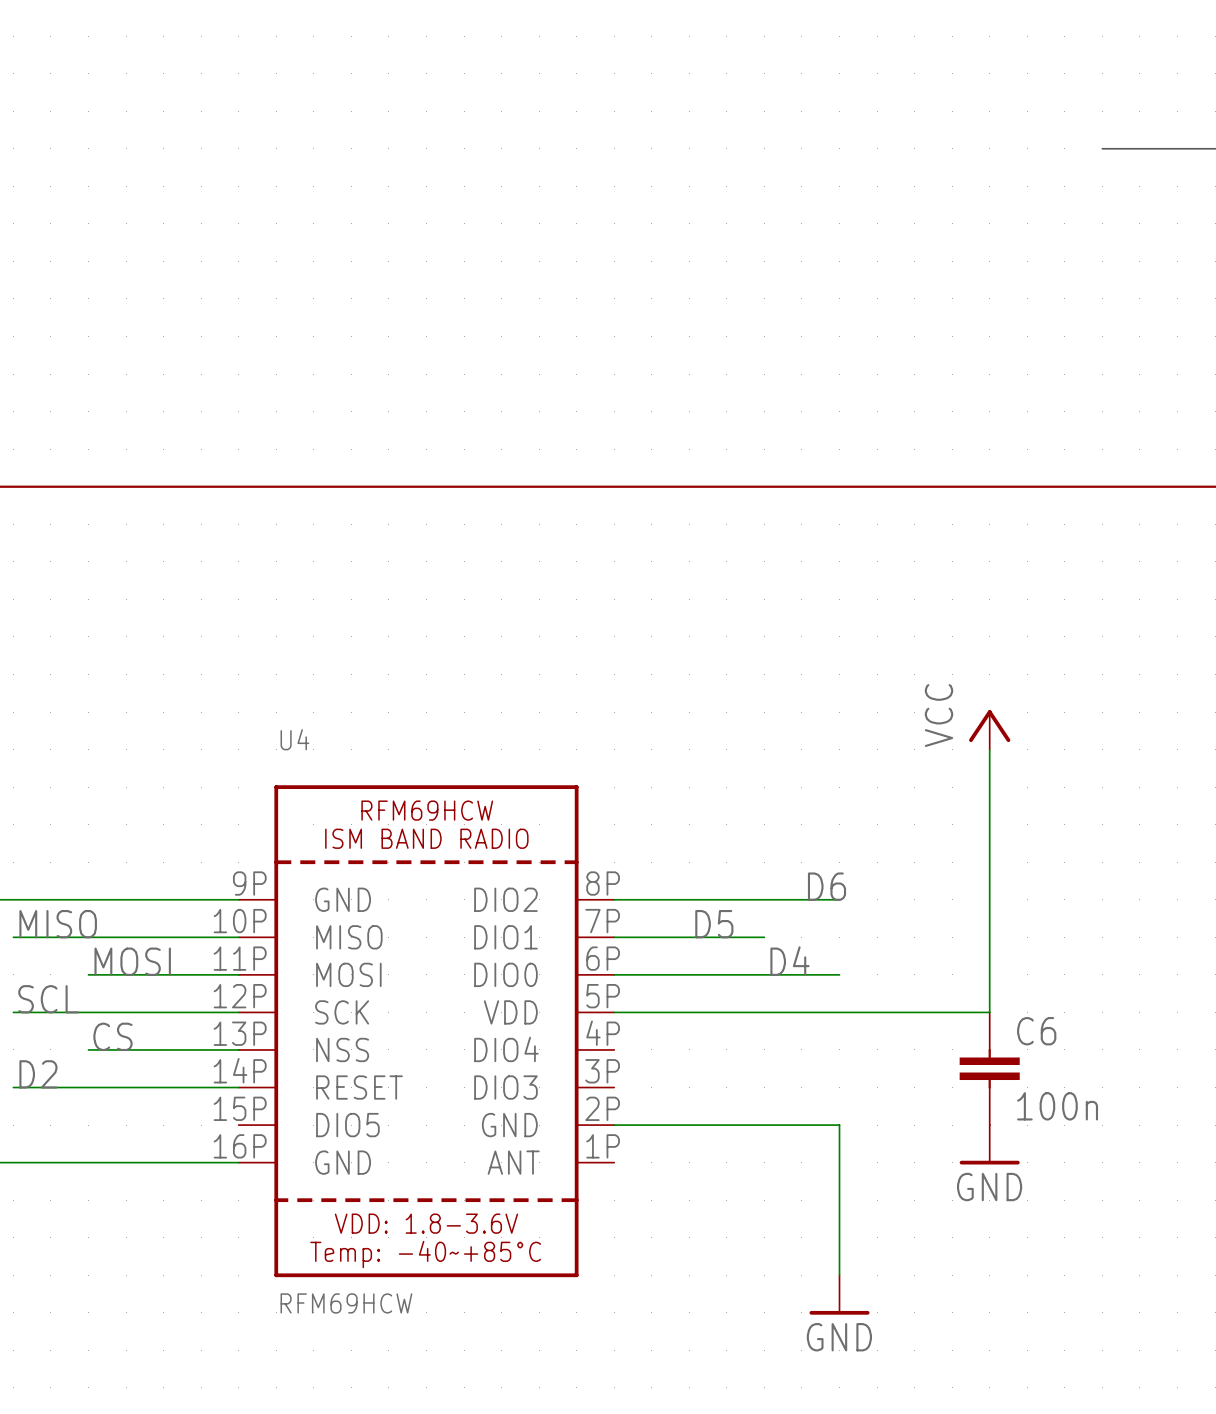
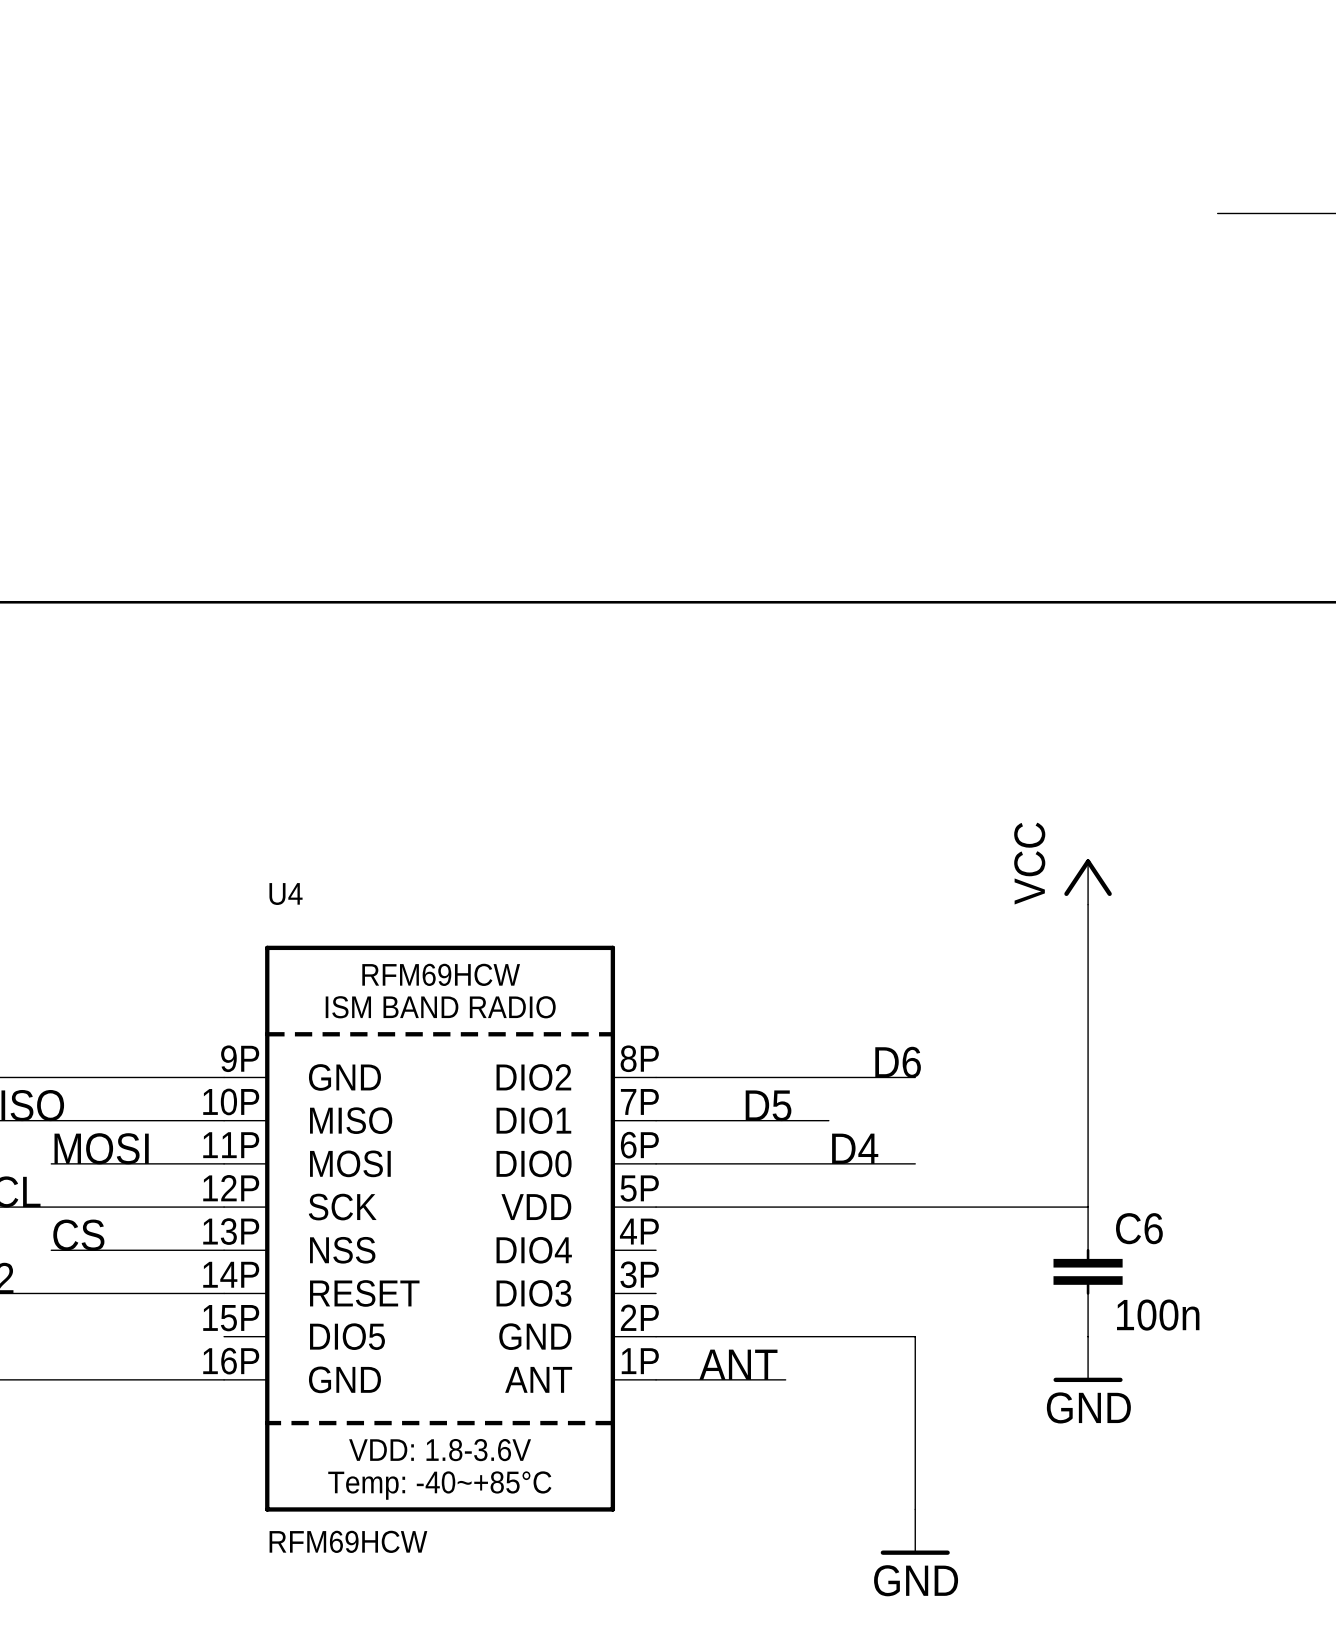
label: none -> ANT (738, 1364)
wire: none -> (656, 1379) (785, 1379)

